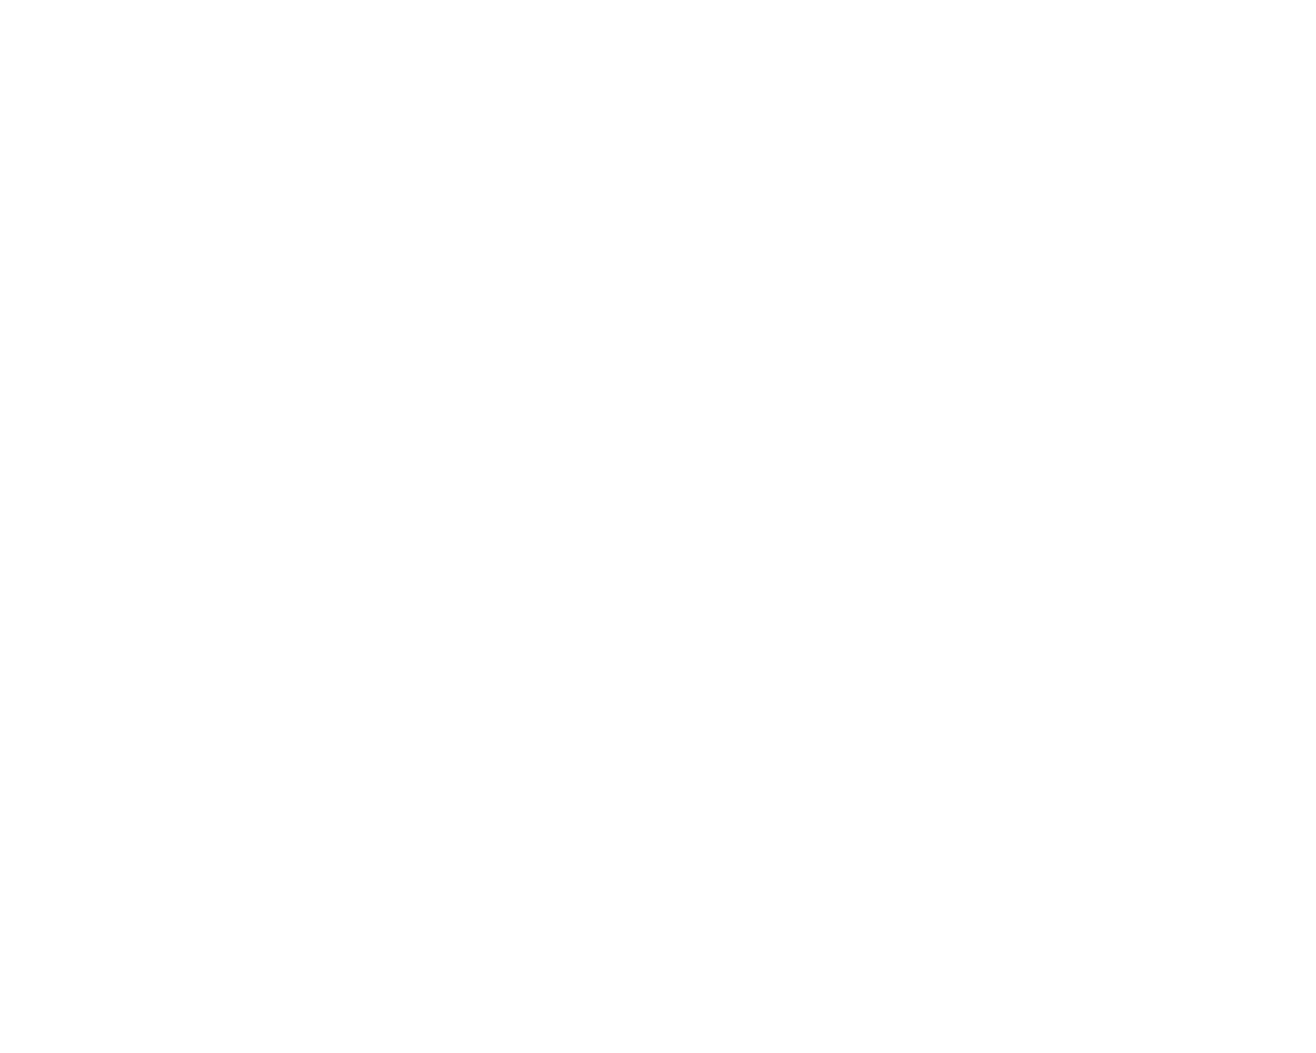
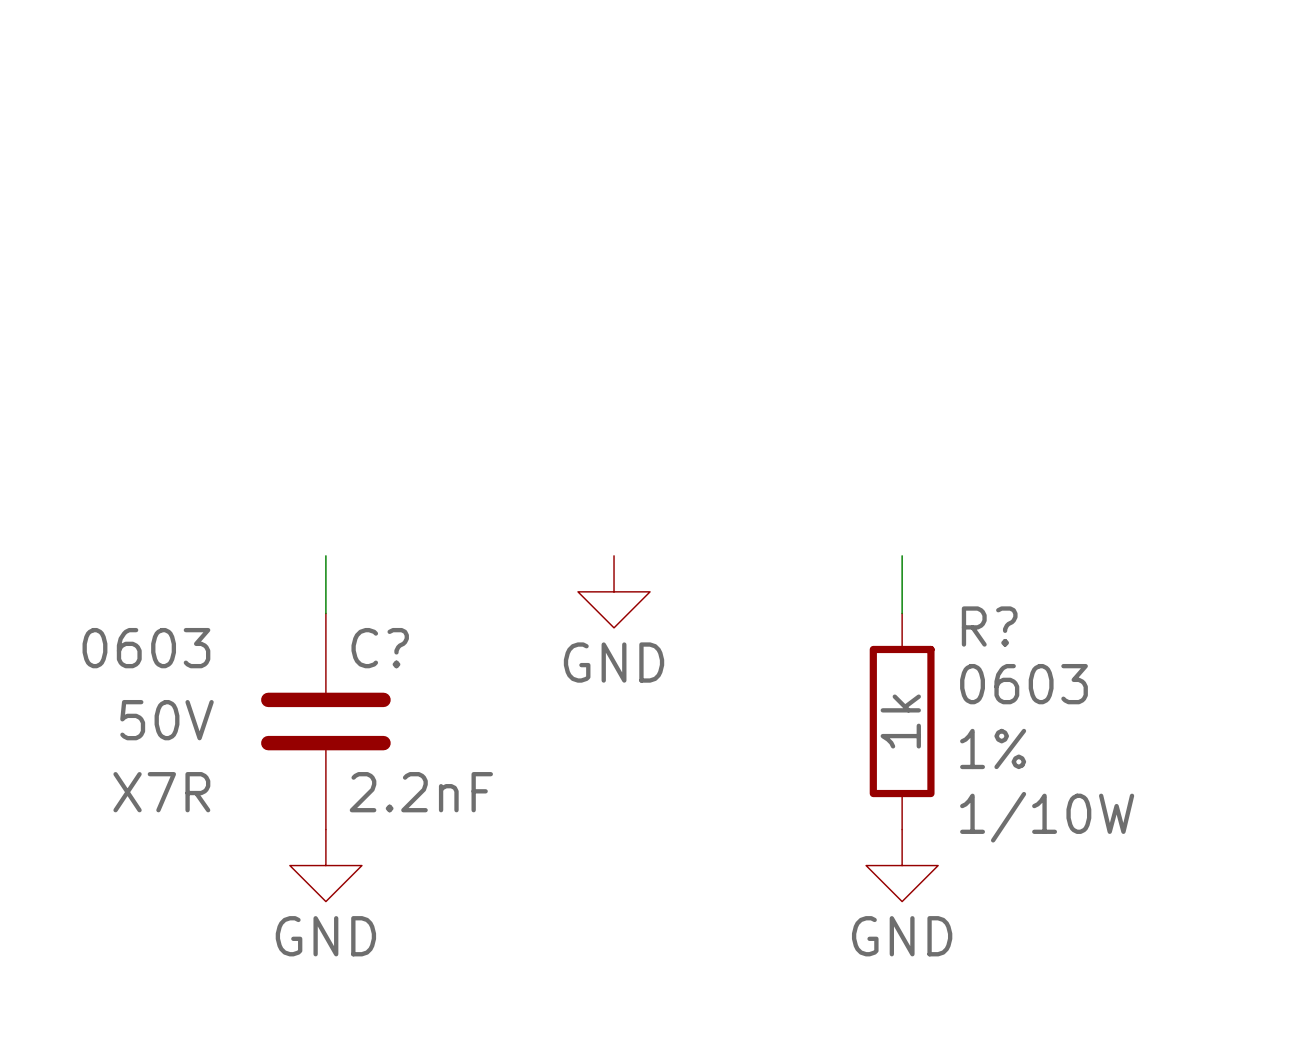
wire: none -> (325, 555) (325, 613)
wire: none -> (902, 555) (902, 613)
power symbol: none -> GND (614, 591)
C?: none -> 2.2nF (325, 721)
R?: none -> 1k (902, 721)
power symbol: none -> GND (325, 865)
power symbol: none -> GND (902, 865)

